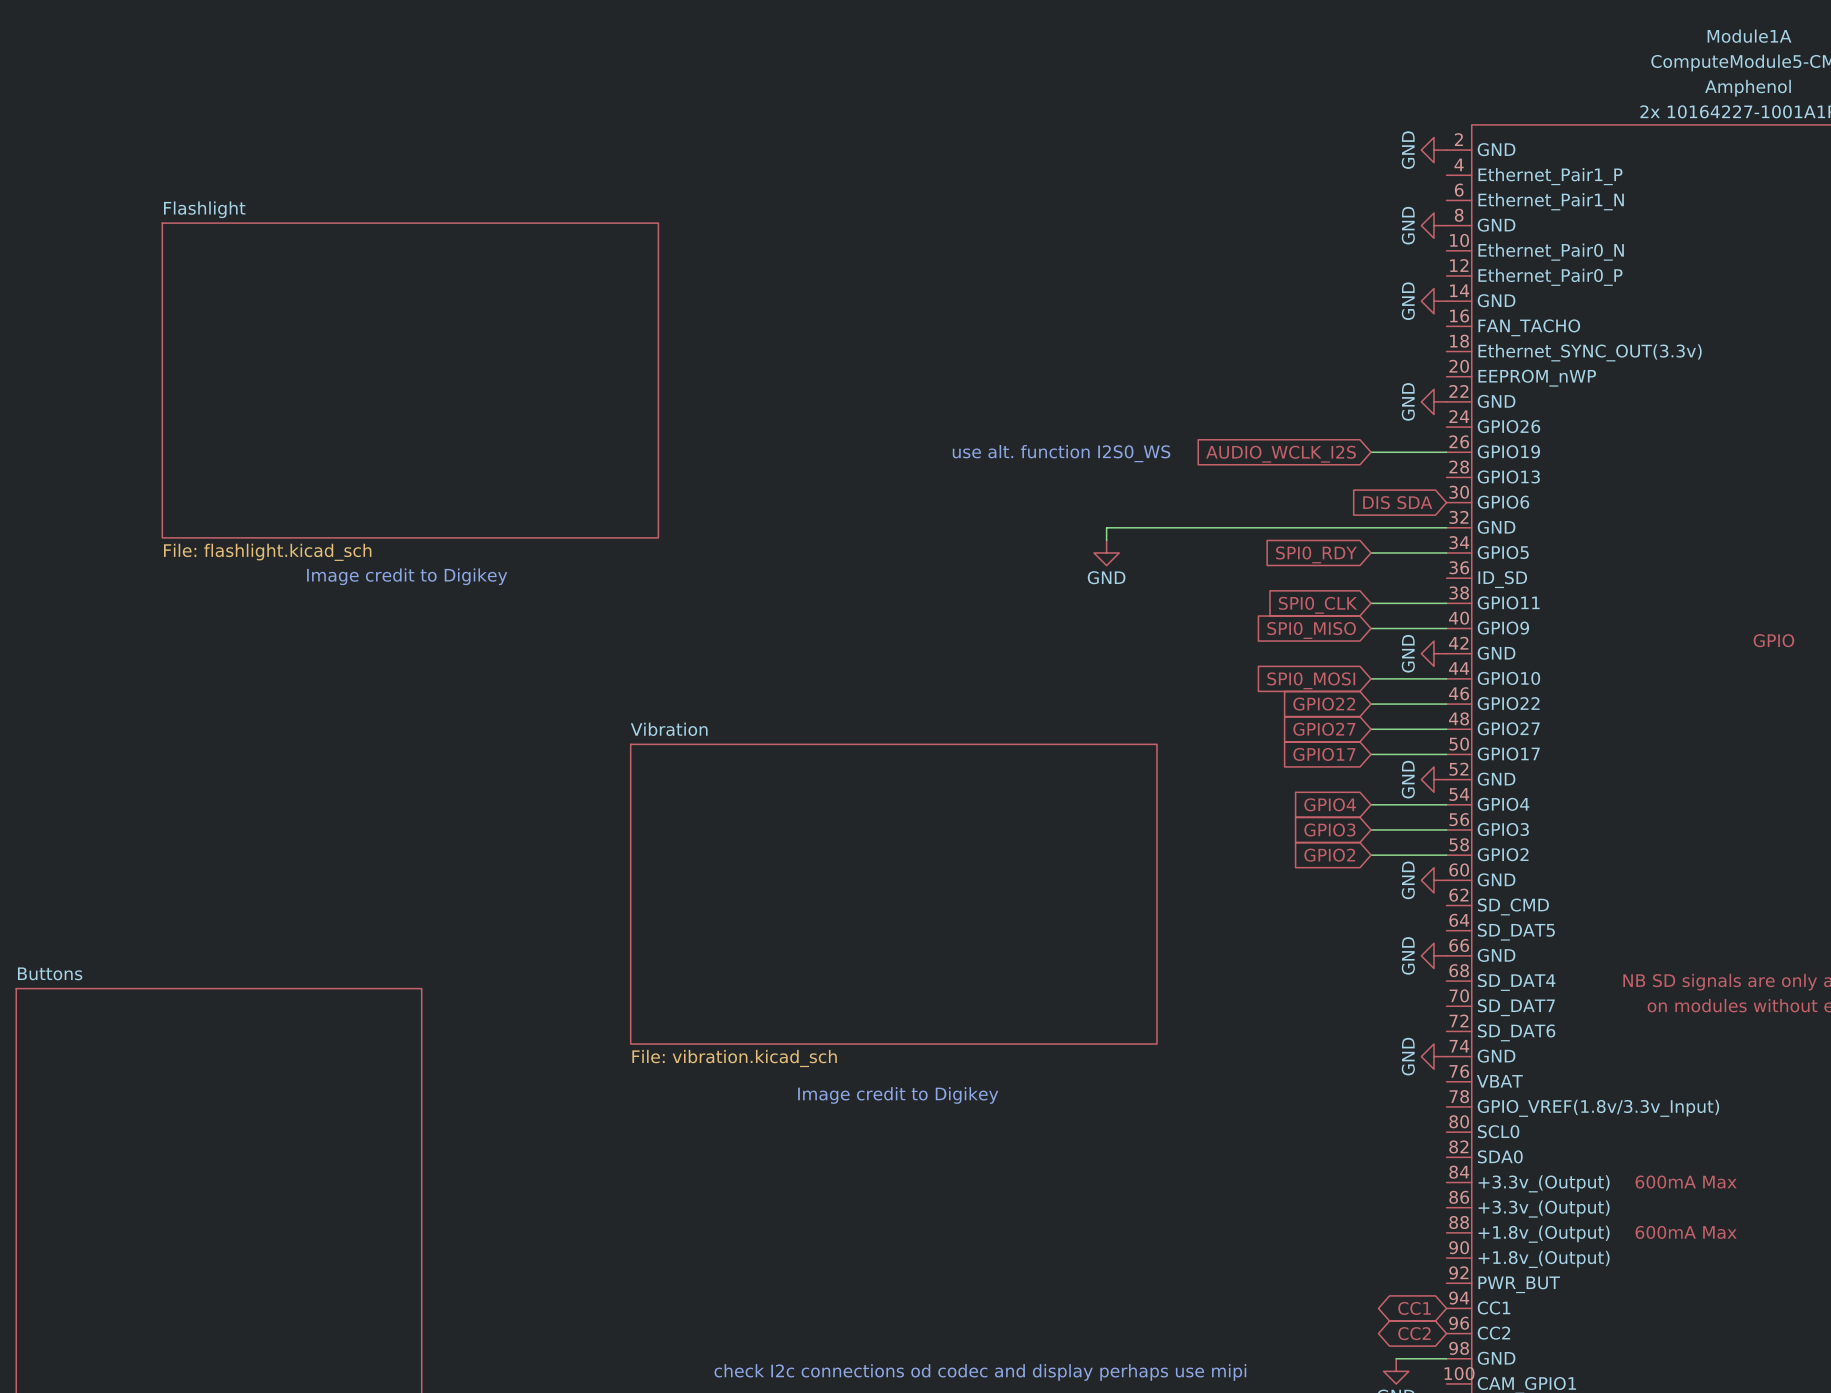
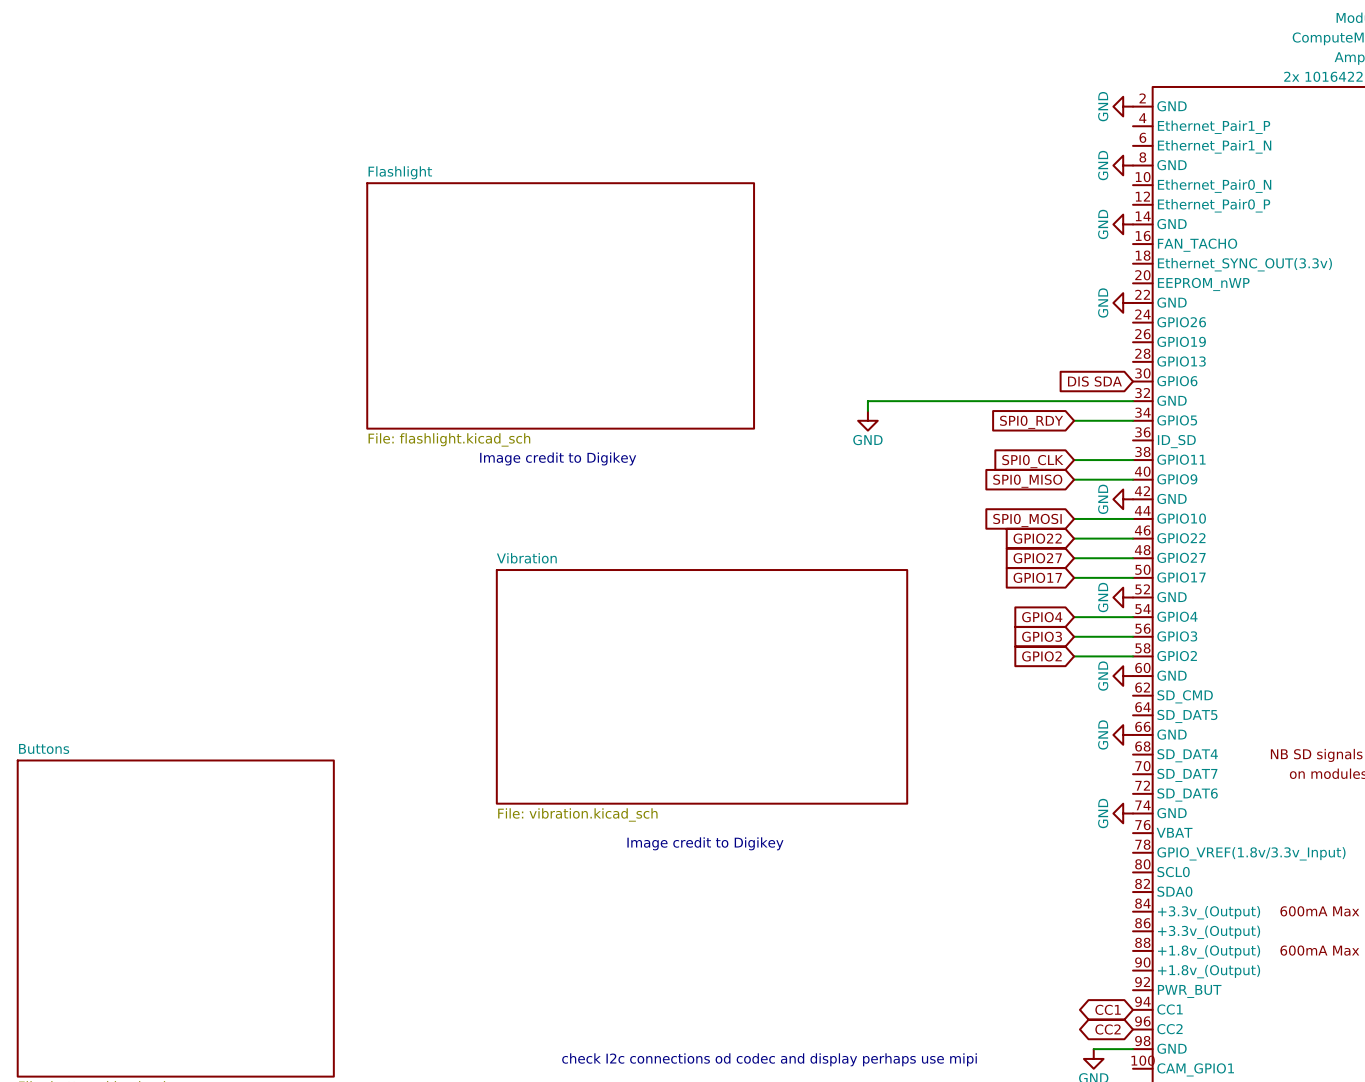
sheet Flashlight: File: flashlight.kicad_sch (410, 380) -> none
sheet Flashlight: none -> File: flashlight.kicad_sch (560, 305)
wire: (1371, 452) (1446, 452) -> none
text: use alt. function I2S0_WS (1061, 453) -> none
global label: AUDIO_WCLK_I2S (1281, 454) -> none
text: Image credit to Digikey (407, 576) -> none
text: none -> Image credit to Digikey (558, 458)

